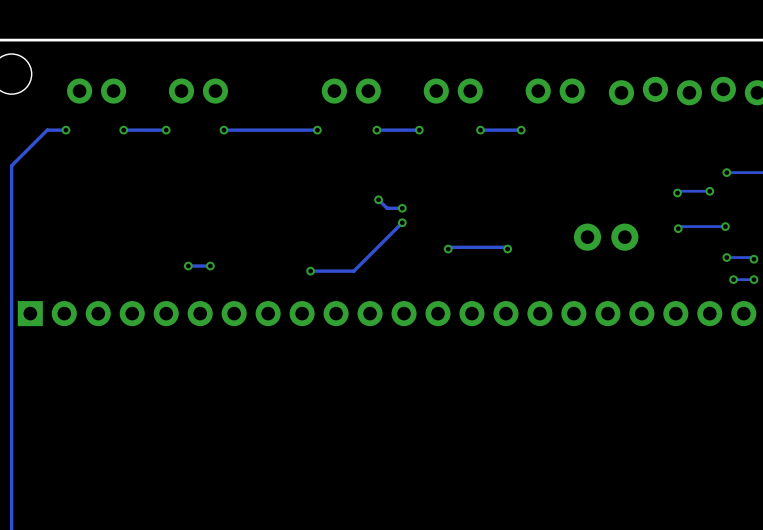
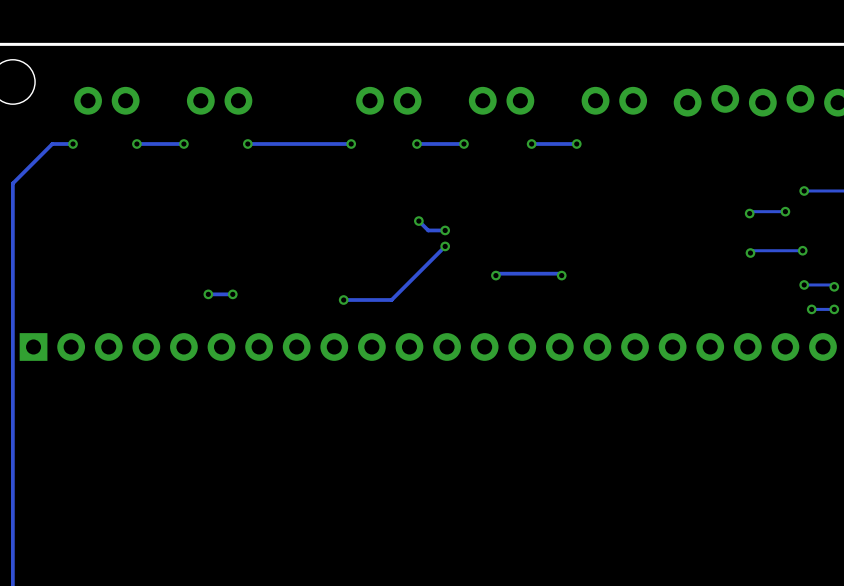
part: (606, 237) -> none

